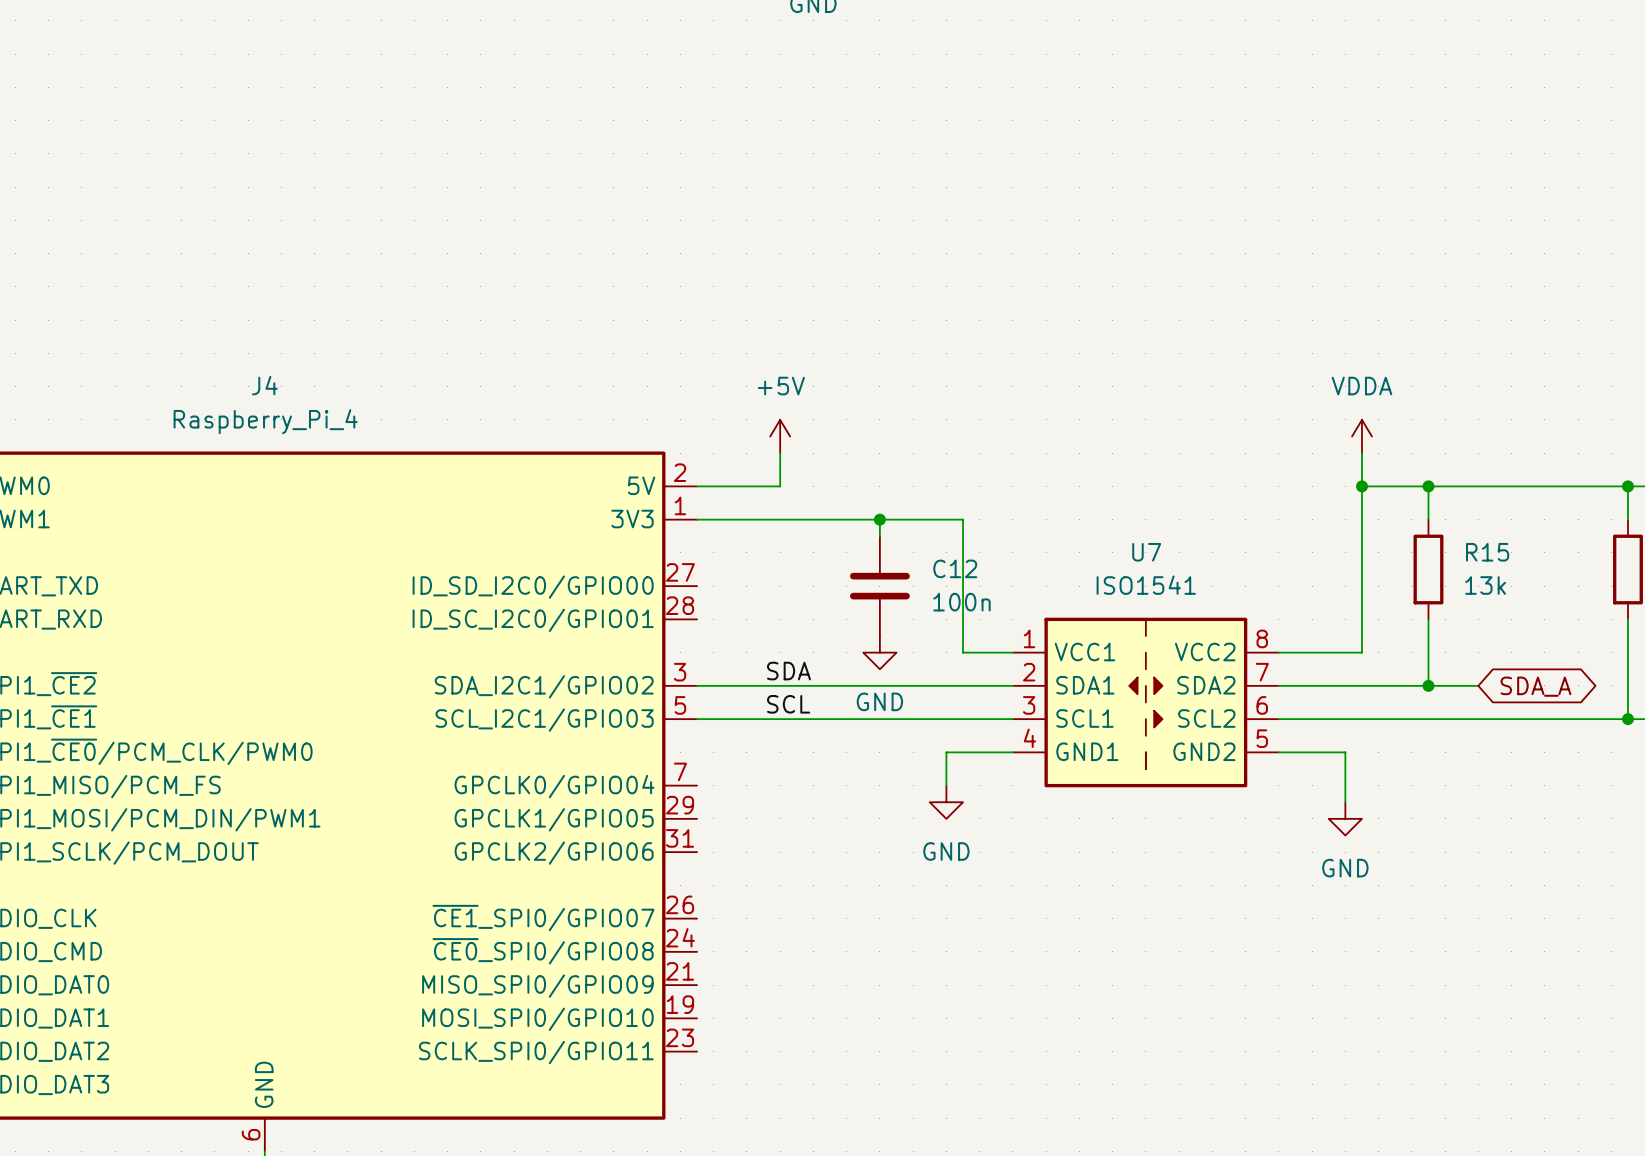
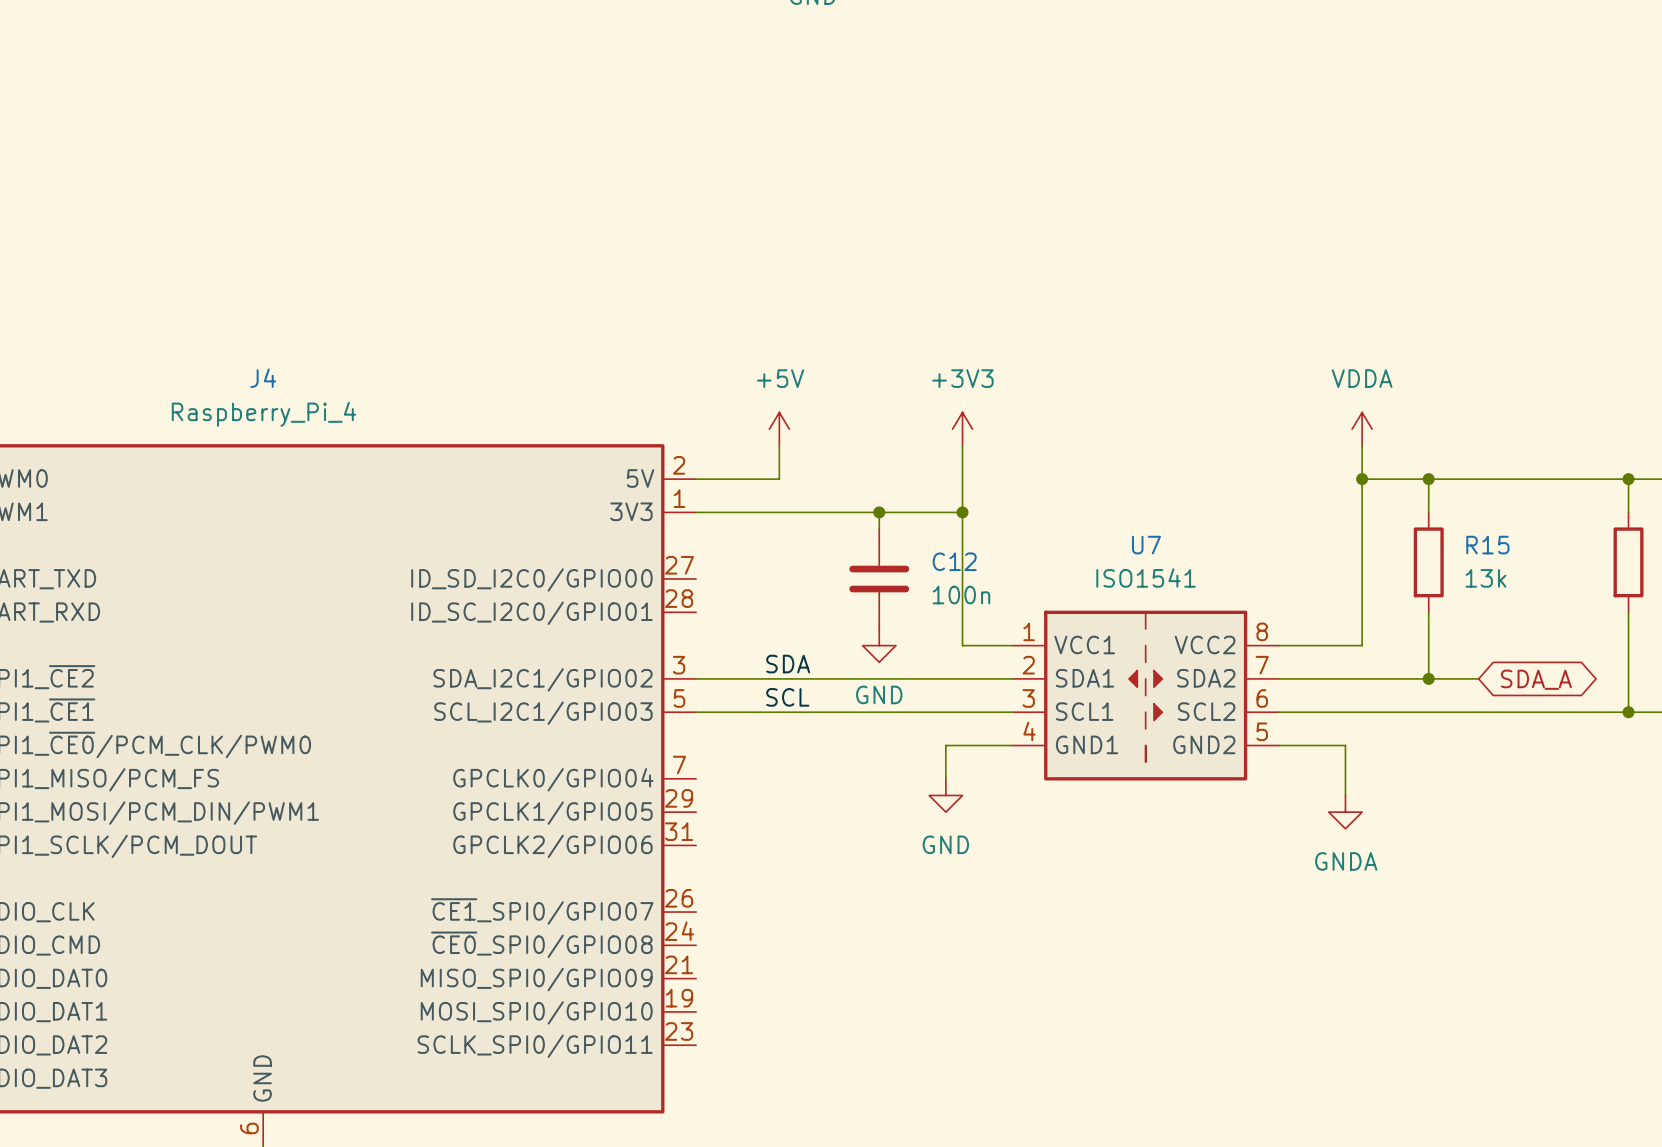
power symbol: none -> +3V3 (962, 429)
wire: none -> (962, 445) (962, 512)
junction: none -> (962, 512)
power symbol: GND (1345, 818) -> GNDA (1345, 812)

